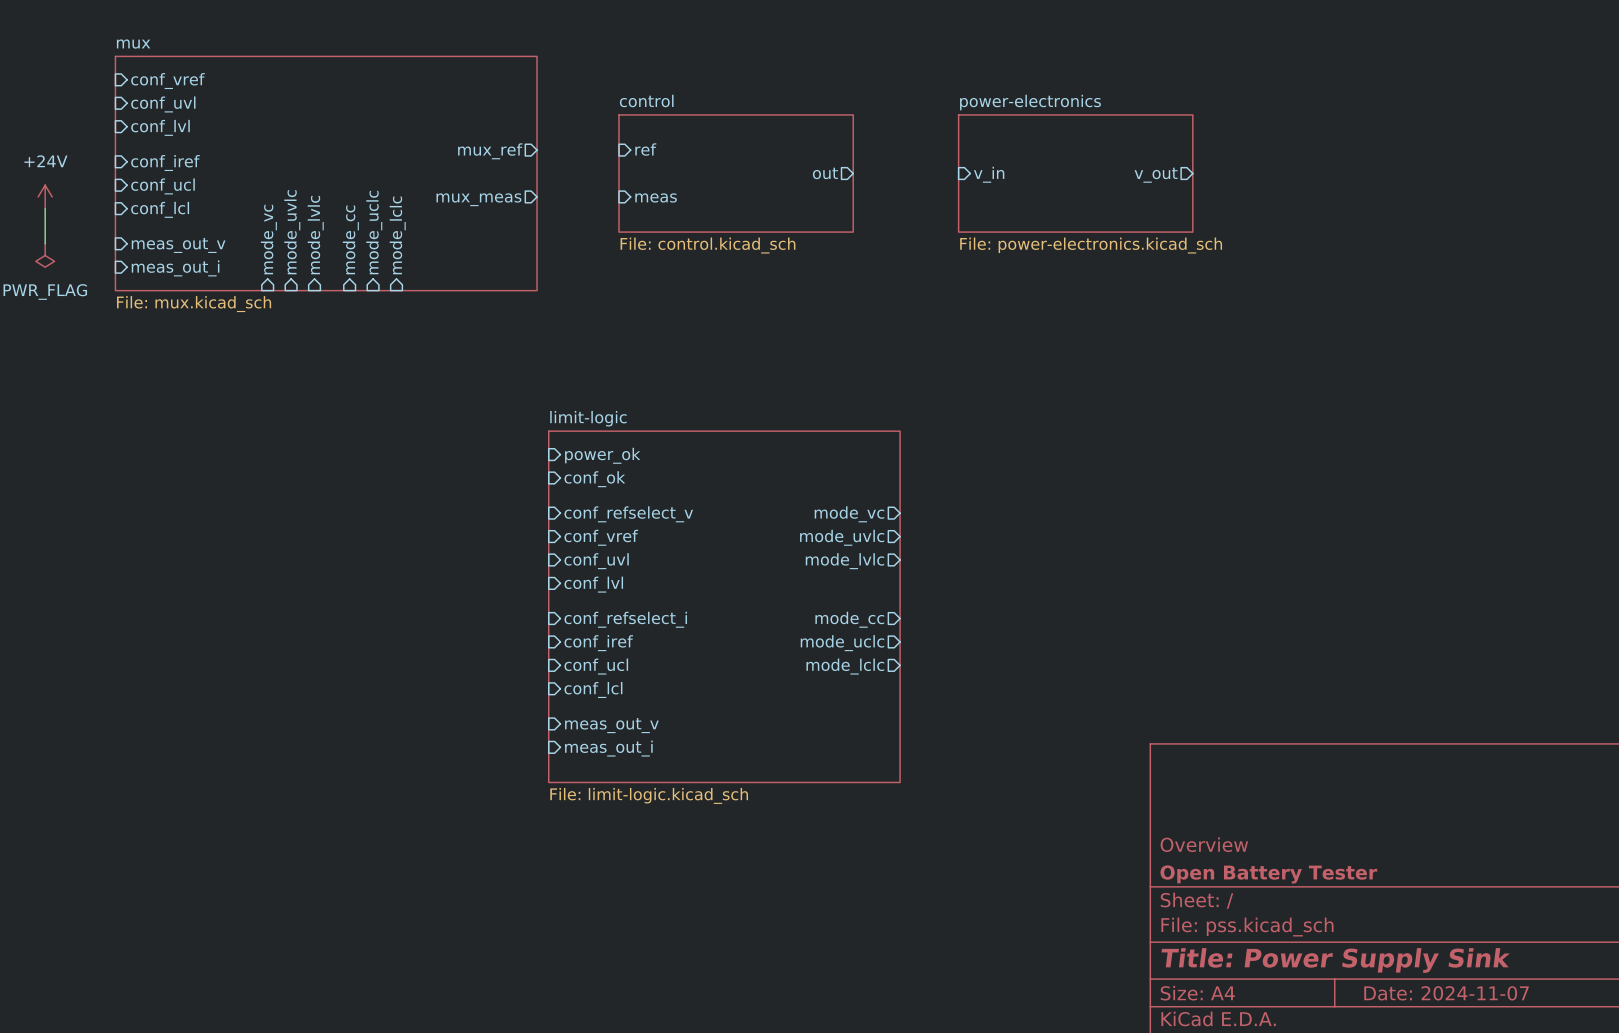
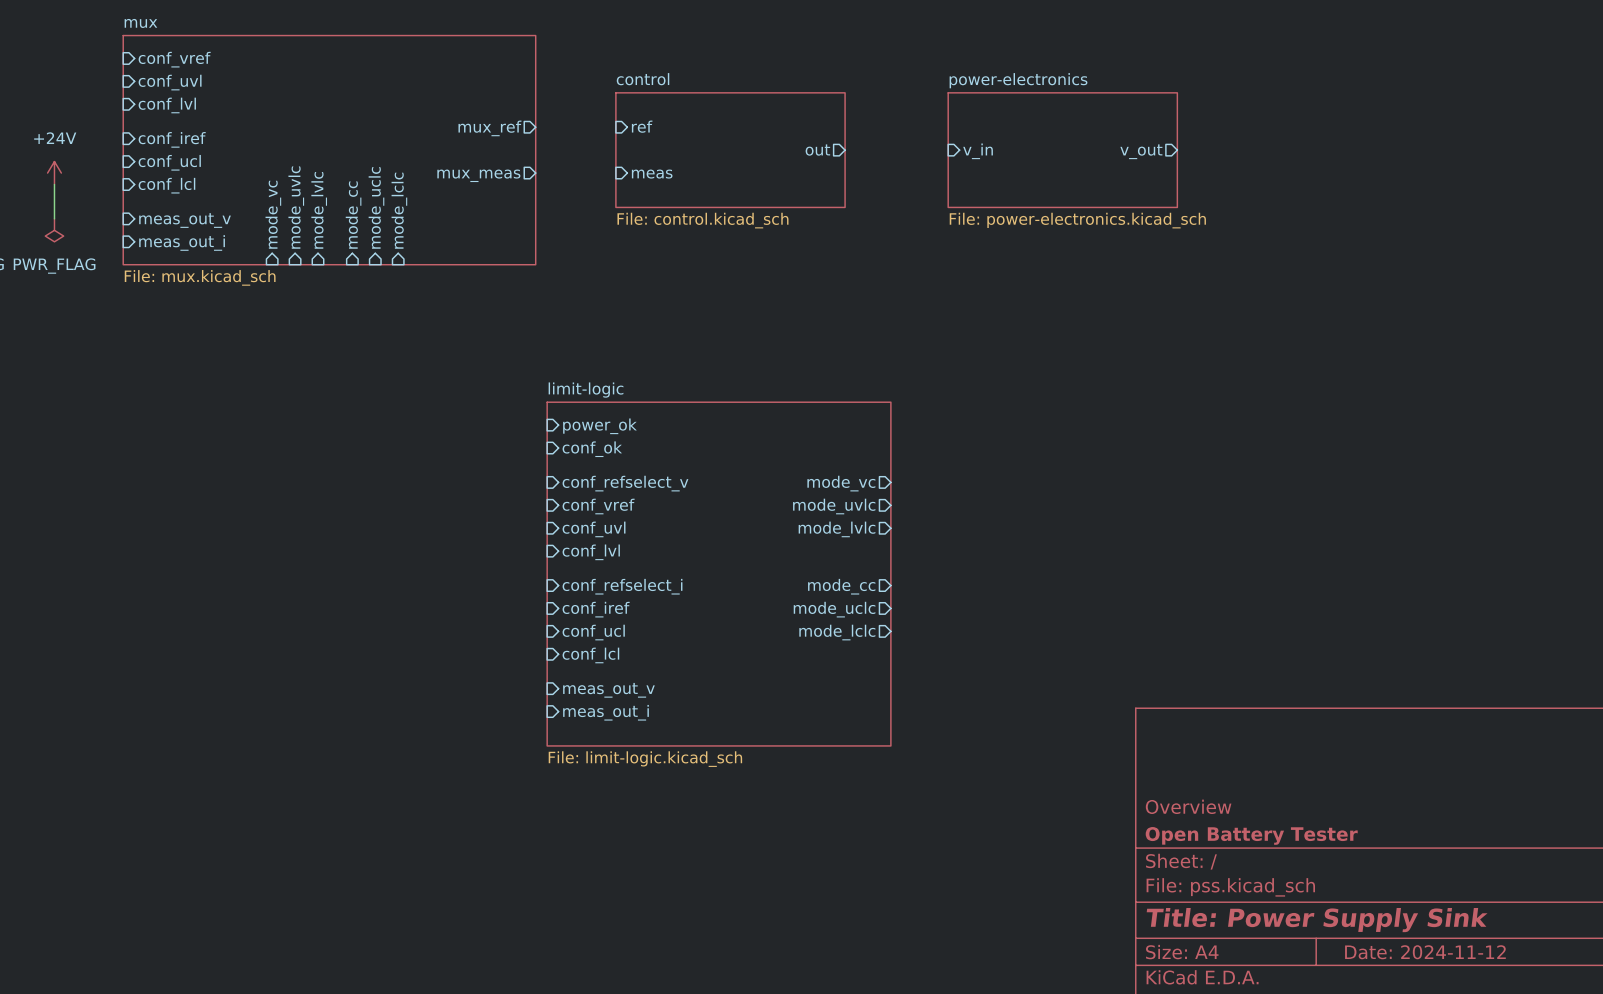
title block: Date: 2024-11-07 (1446, 993) -> Date: 2024-11-12 (1425, 952)

